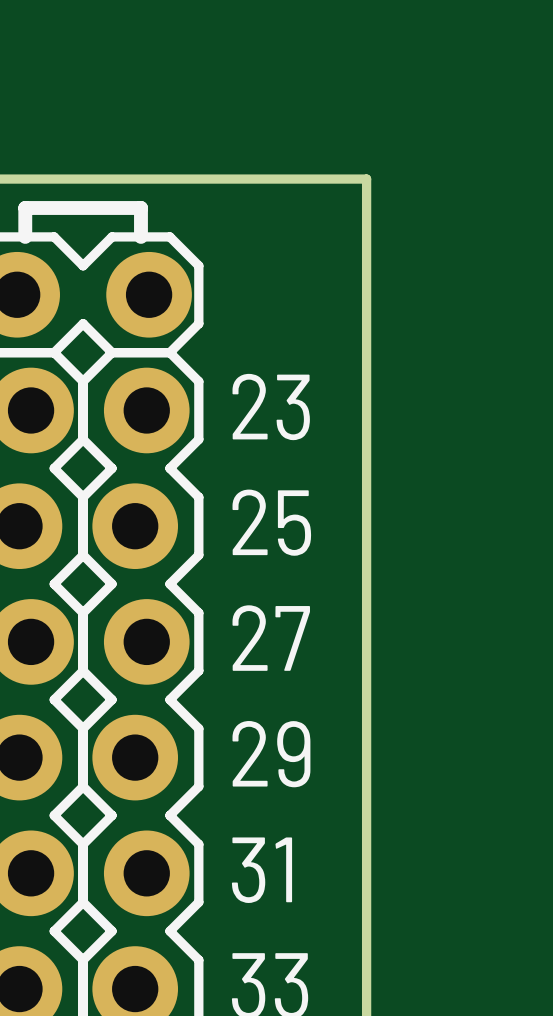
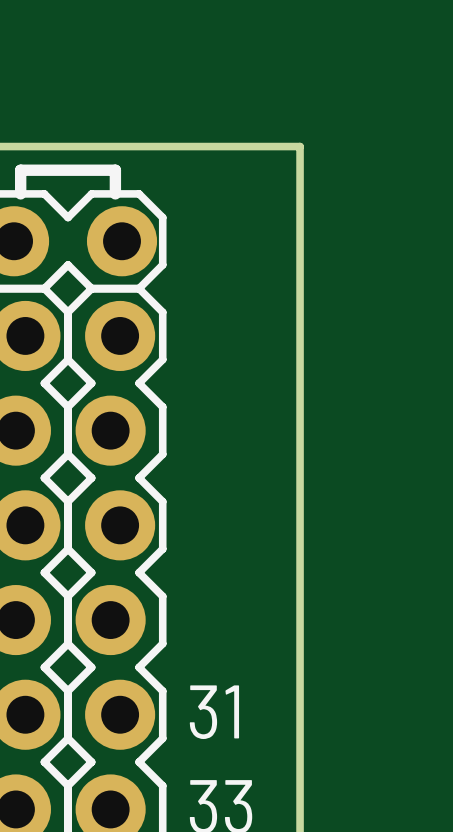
text: 23 (271, 407) -> none
text: 25 (271, 522) -> none
text: 27 (271, 638) -> none
text: 29 (271, 754) -> none

